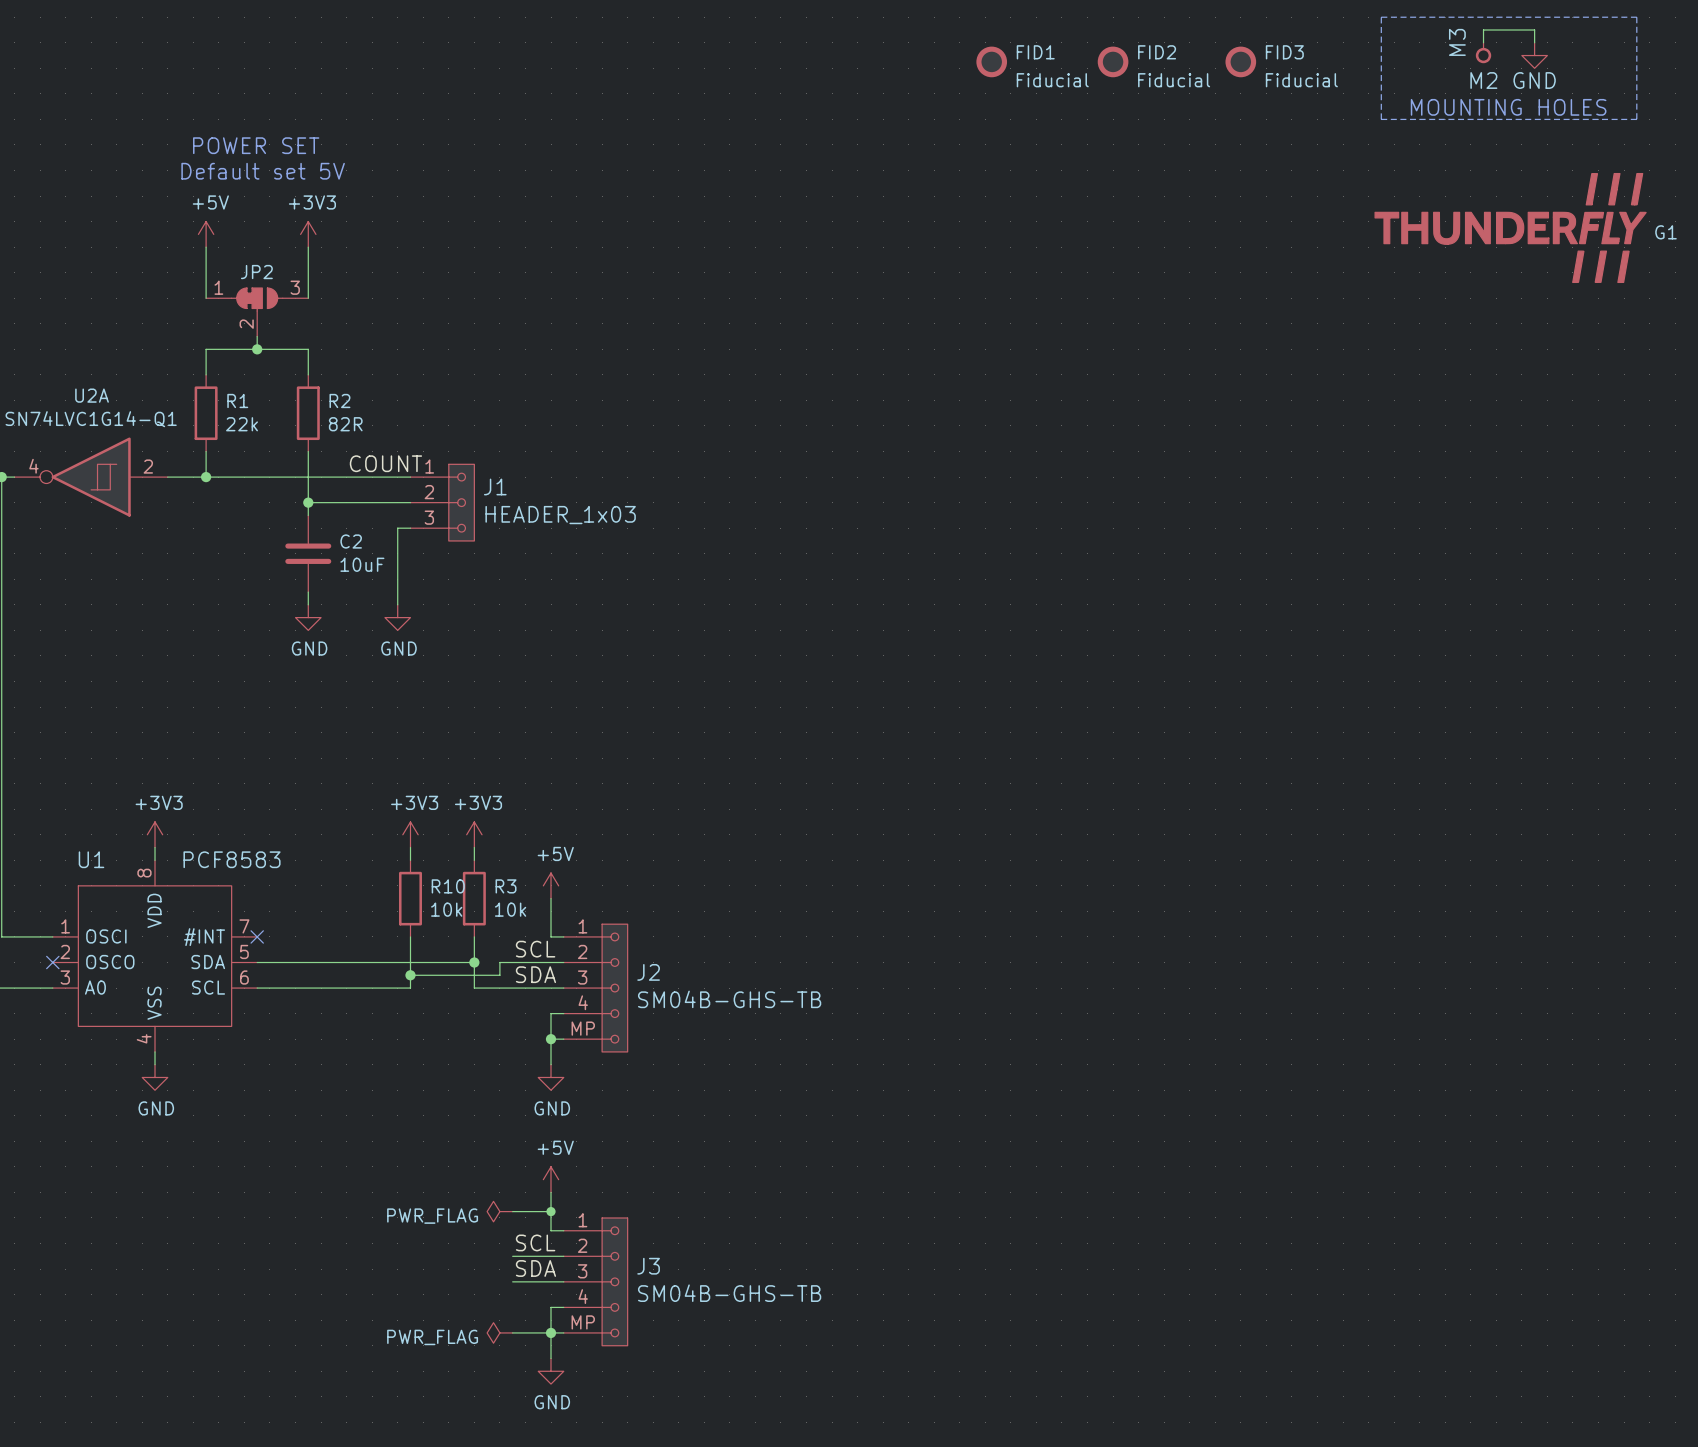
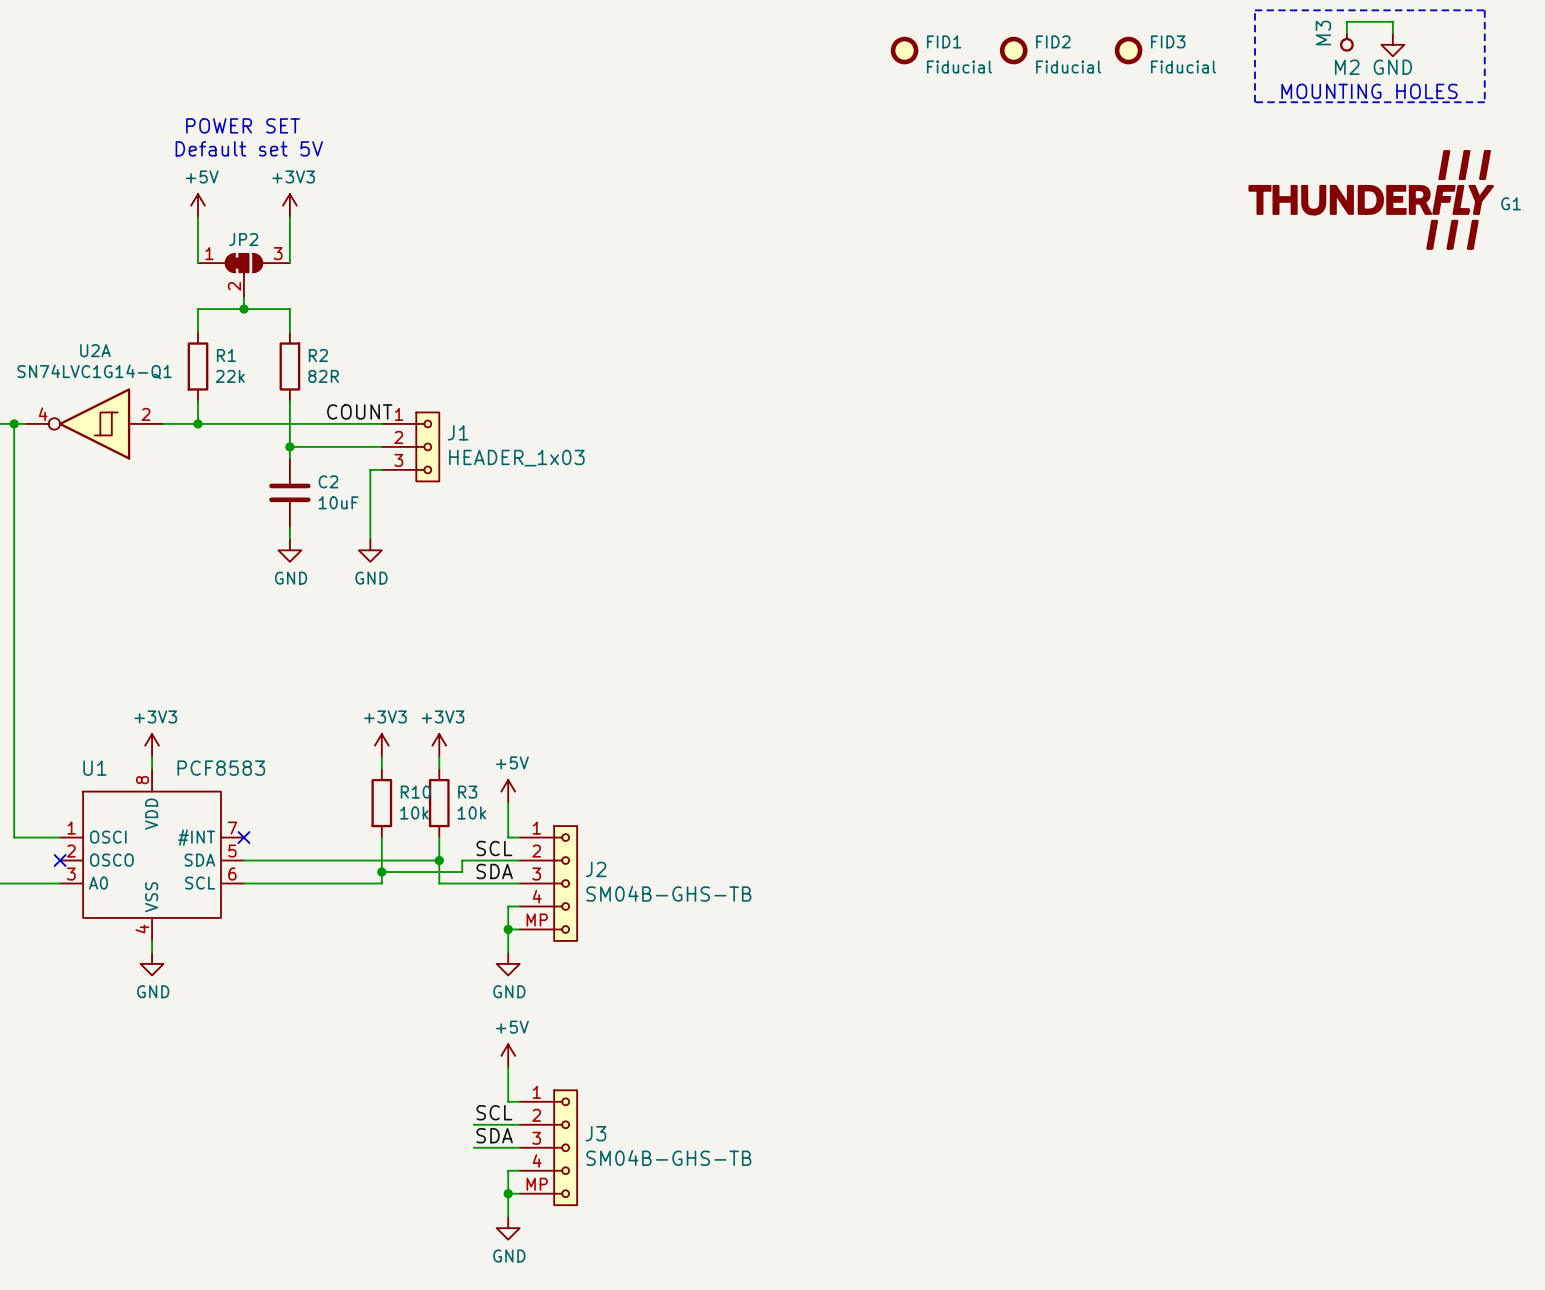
power symbol: PWR_FLAG (499, 1211) -> none
wire: (512, 1211) (551, 1211) -> none
junction: (551, 1211) -> none
power symbol: PWR_FLAG (499, 1332) -> none
wire: (512, 1332) (551, 1332) -> none

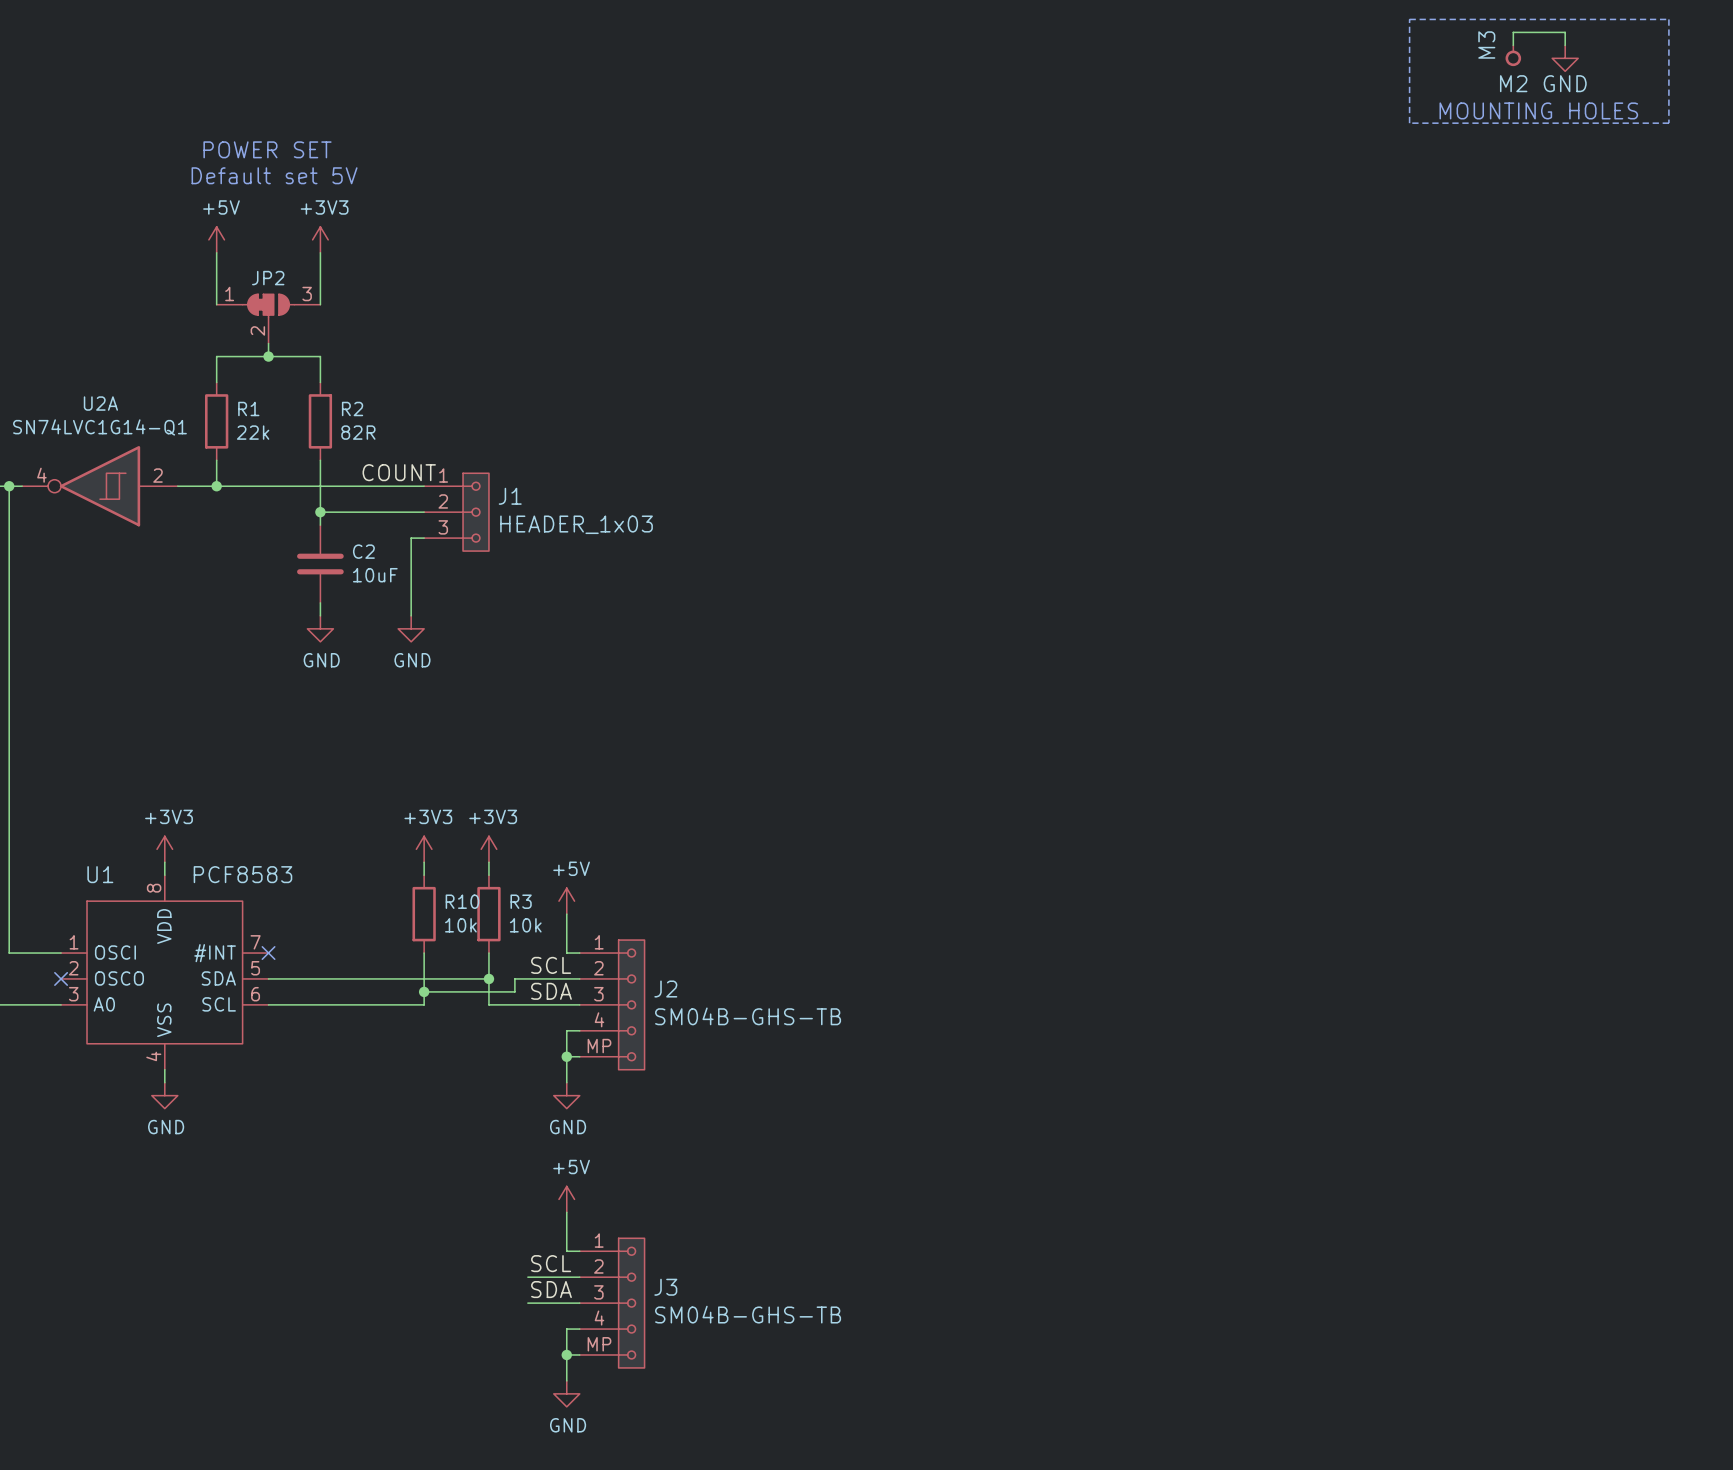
FID1: Fiducial (904, 50) -> none
FID2: Fiducial (1013, 50) -> none
FID3: Fiducial (1128, 50) -> none
G1: (1371, 199) -> none

